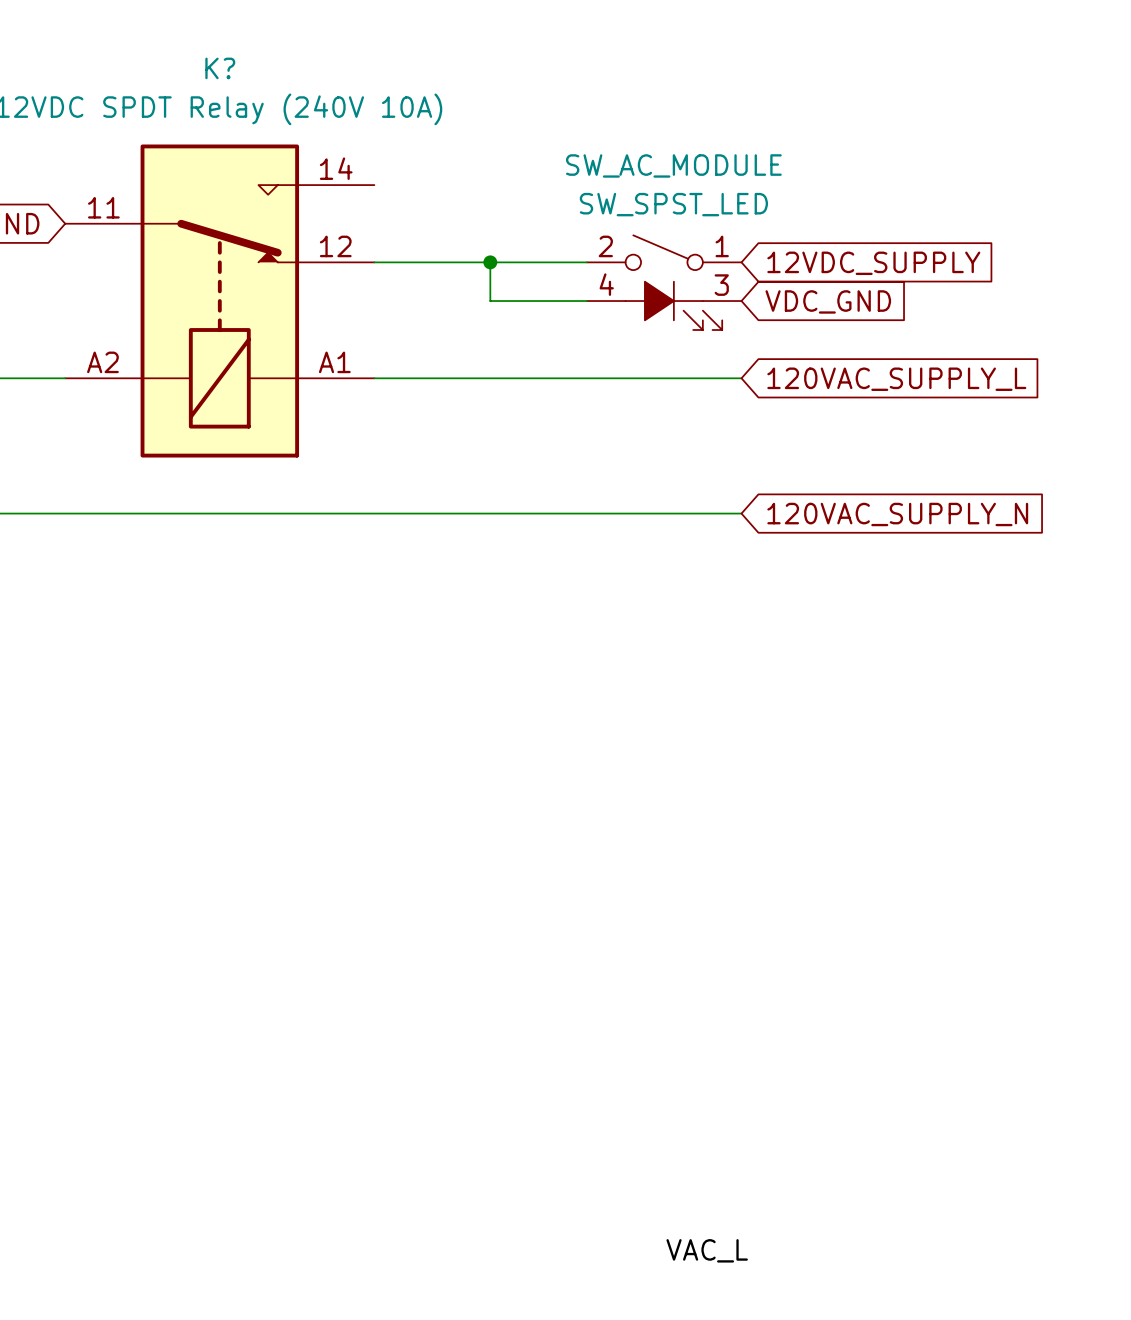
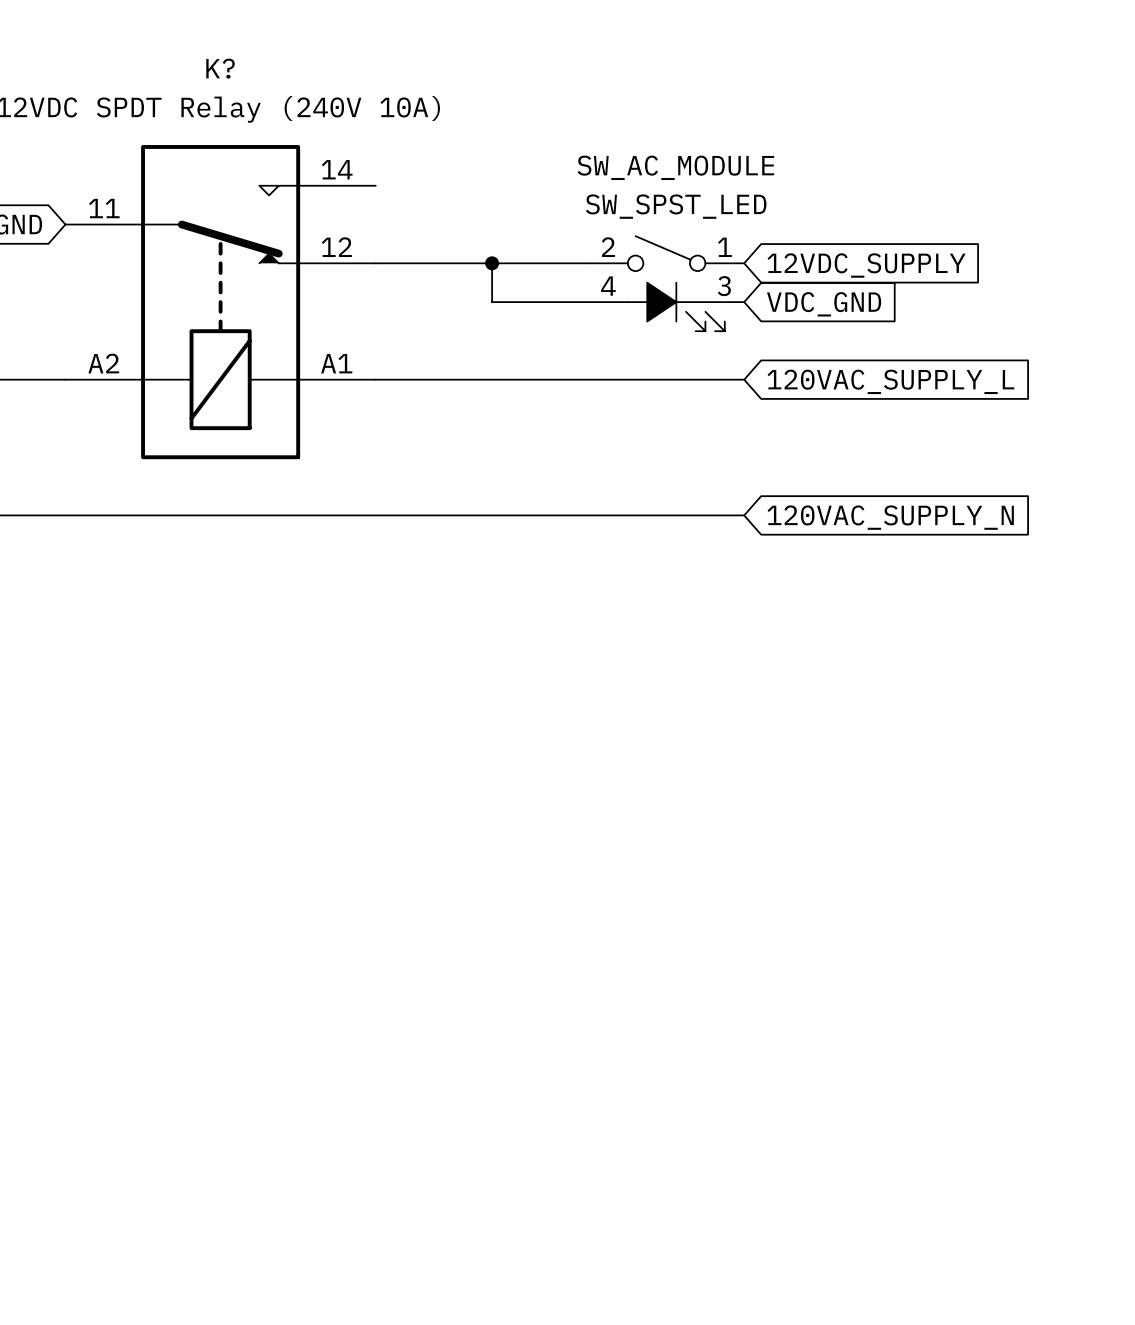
label: VAC_L (707, 1250) -> none

